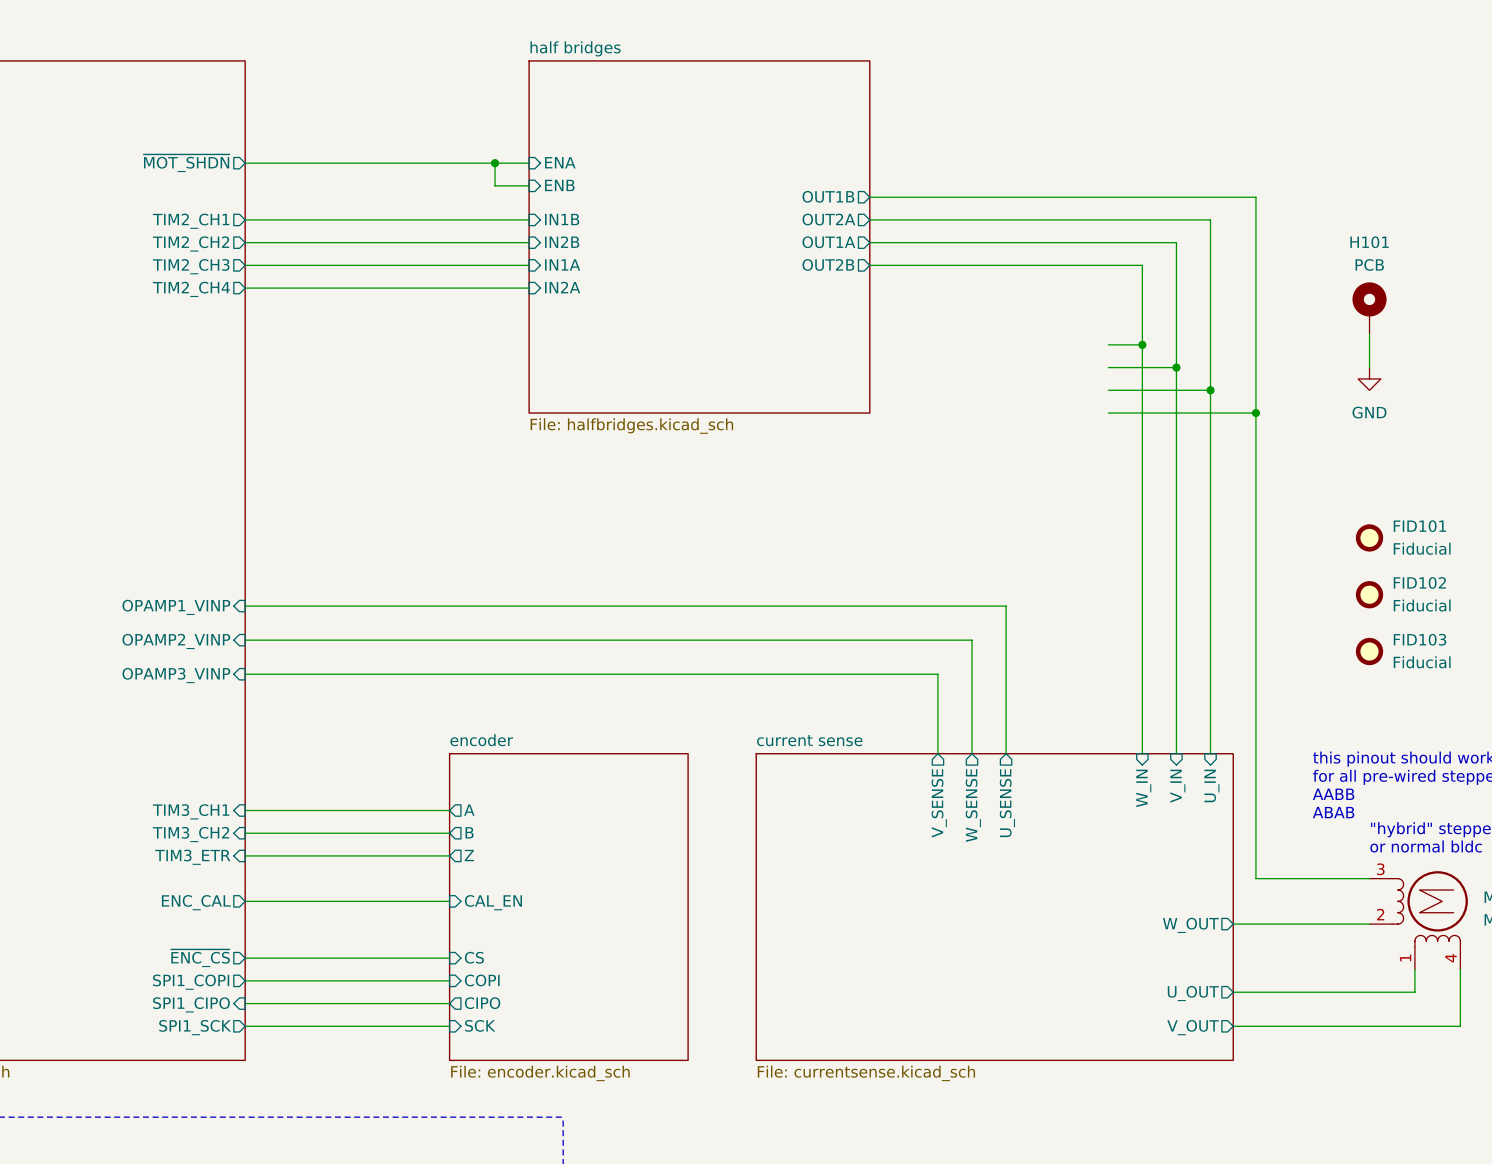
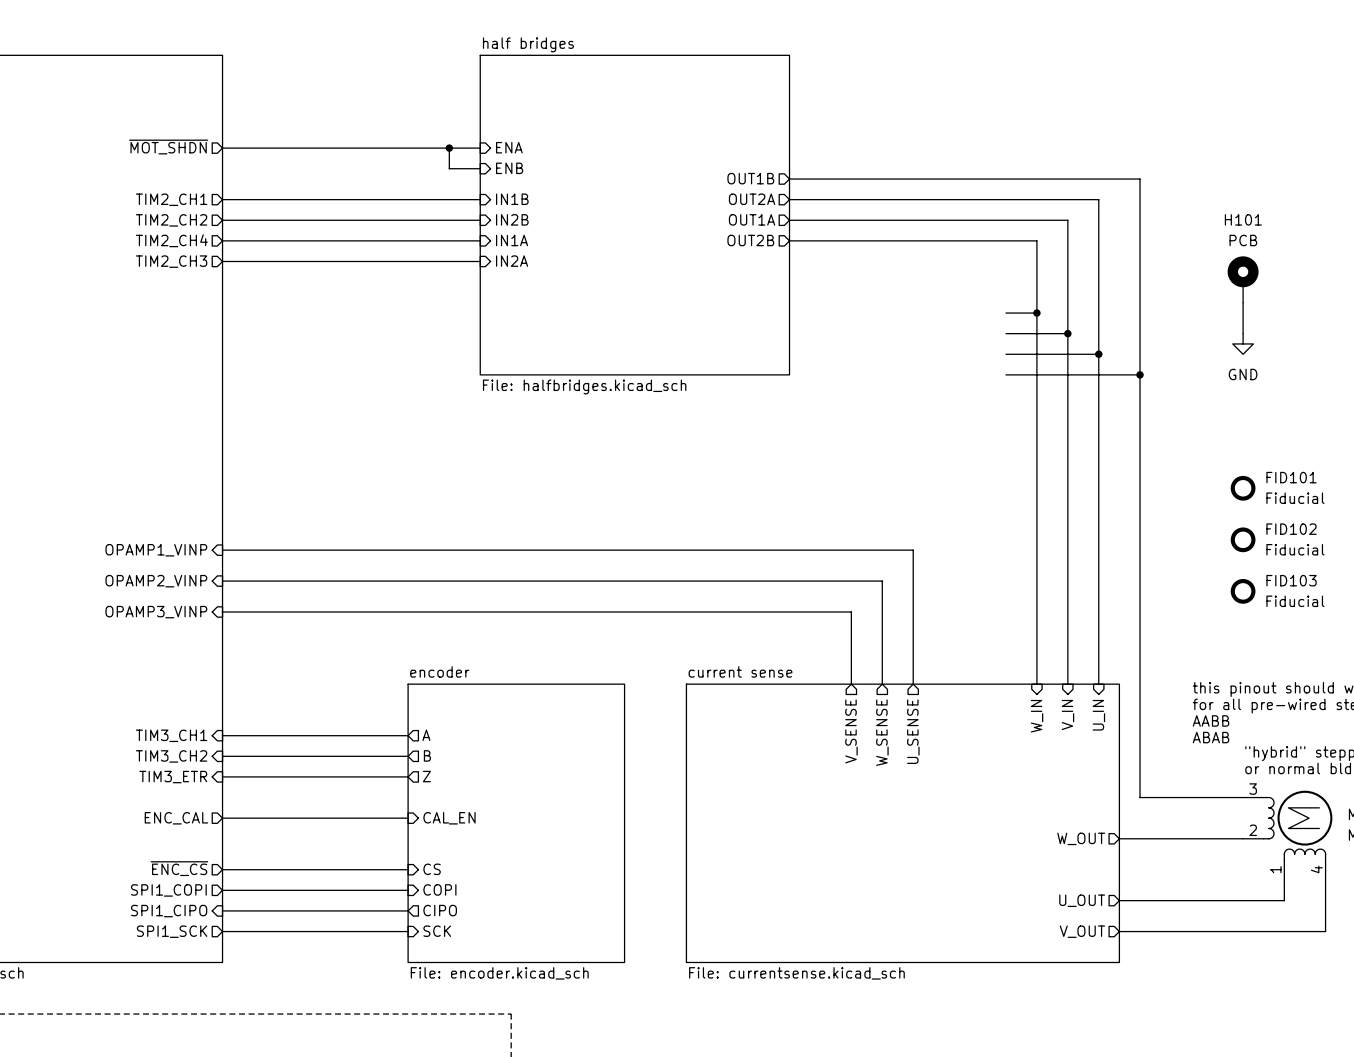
sheet pin: TIM2_CH3 (191, 266) -> TIM2_CH4 (171, 240)
sheet pin: TIM2_CH4 (191, 289) -> TIM2_CH3 (171, 261)

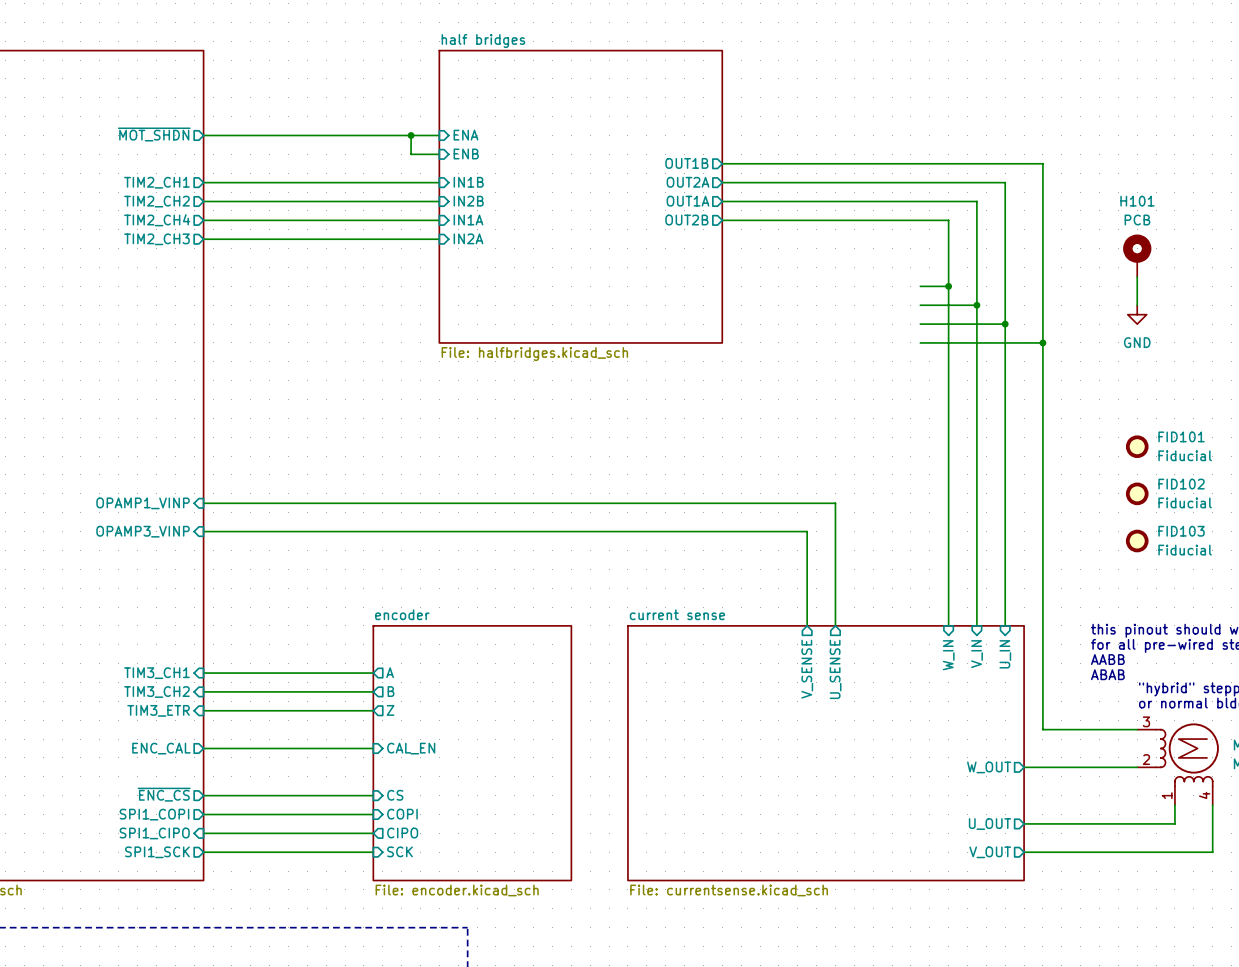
sheet pin: OPAMP2_VINP (156, 581) -> OPAMP3_VINP (143, 531)
wire: (222, 611) (851, 611) (851, 684) -> none
sheet pin: OPAMP3_VINP (156, 612) -> none
sheet pin: V_SENSE (851, 731) -> none
sheet pin: W_SENSE (882, 732) -> V_SENSE (807, 669)

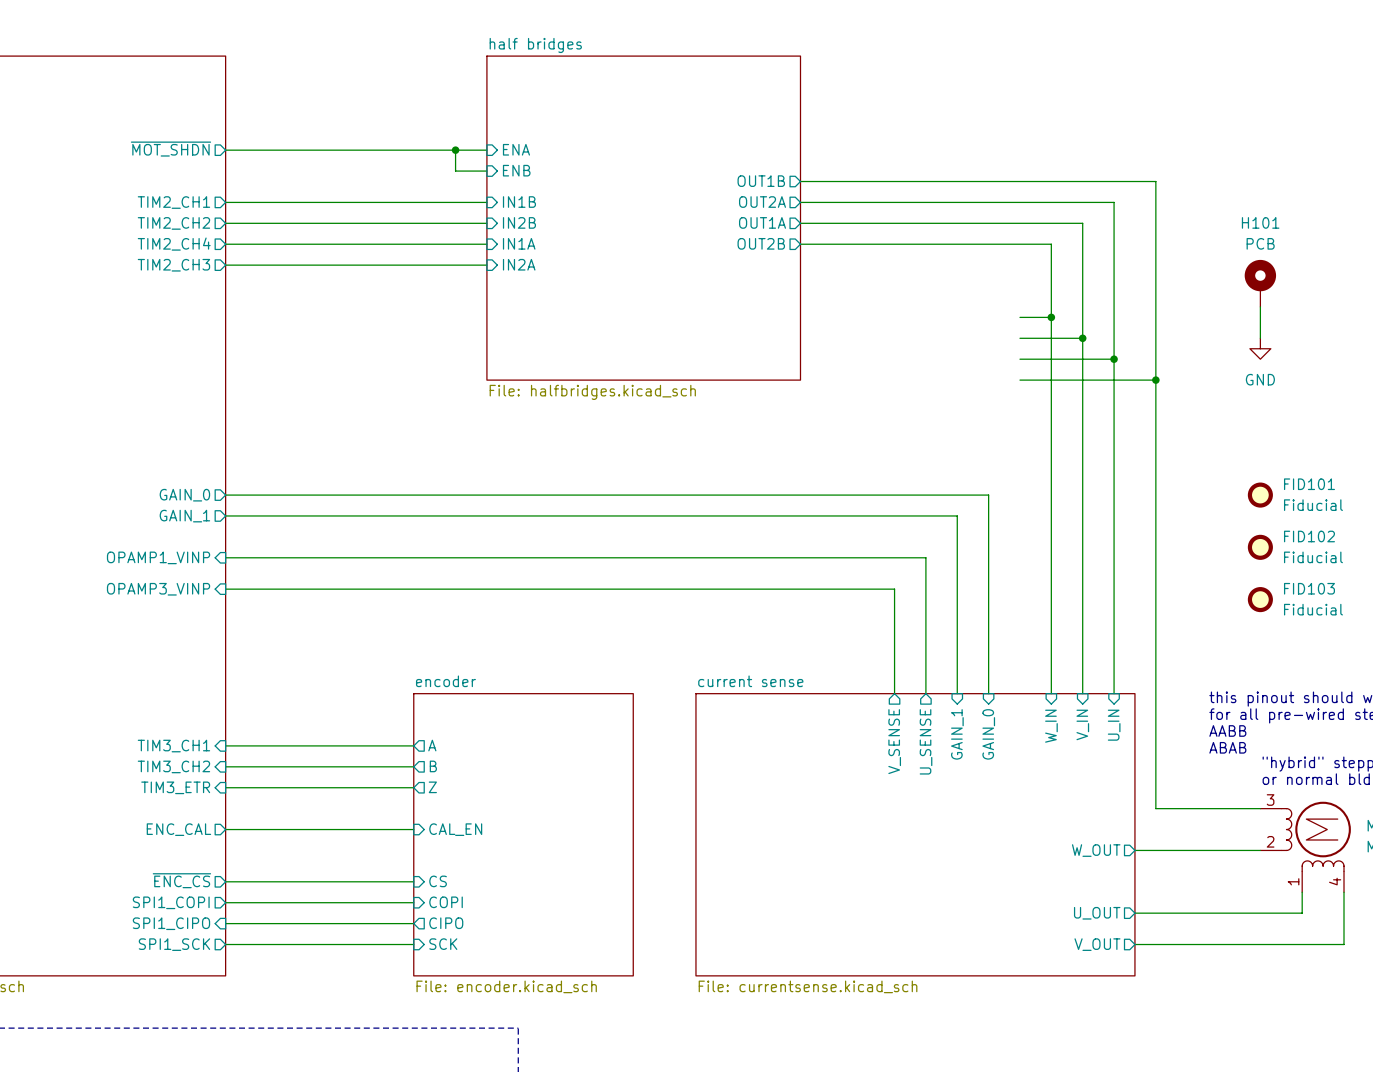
sheet pin: none -> GAIN_0 (184, 495)
wire: none -> (225, 495) (988, 495) (988, 693)
sheet pin: none -> GAIN_1 (184, 516)
wire: none -> (225, 515) (957, 515) (957, 693)
sheet pin: none -> GAIN_1 (957, 734)
sheet pin: none -> GAIN_0 (988, 734)

